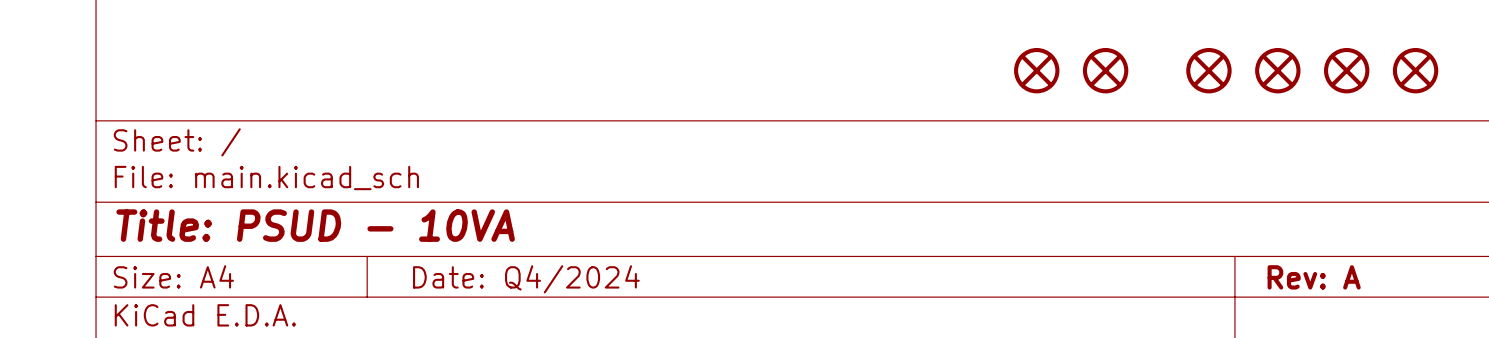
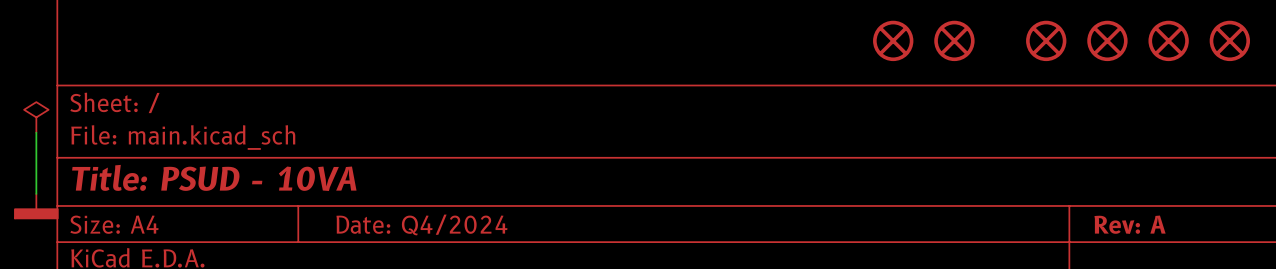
power symbol: none -> (36, 117)
wire: none -> (36, 132) (36, 193)
power symbol: none -> (36, 206)

